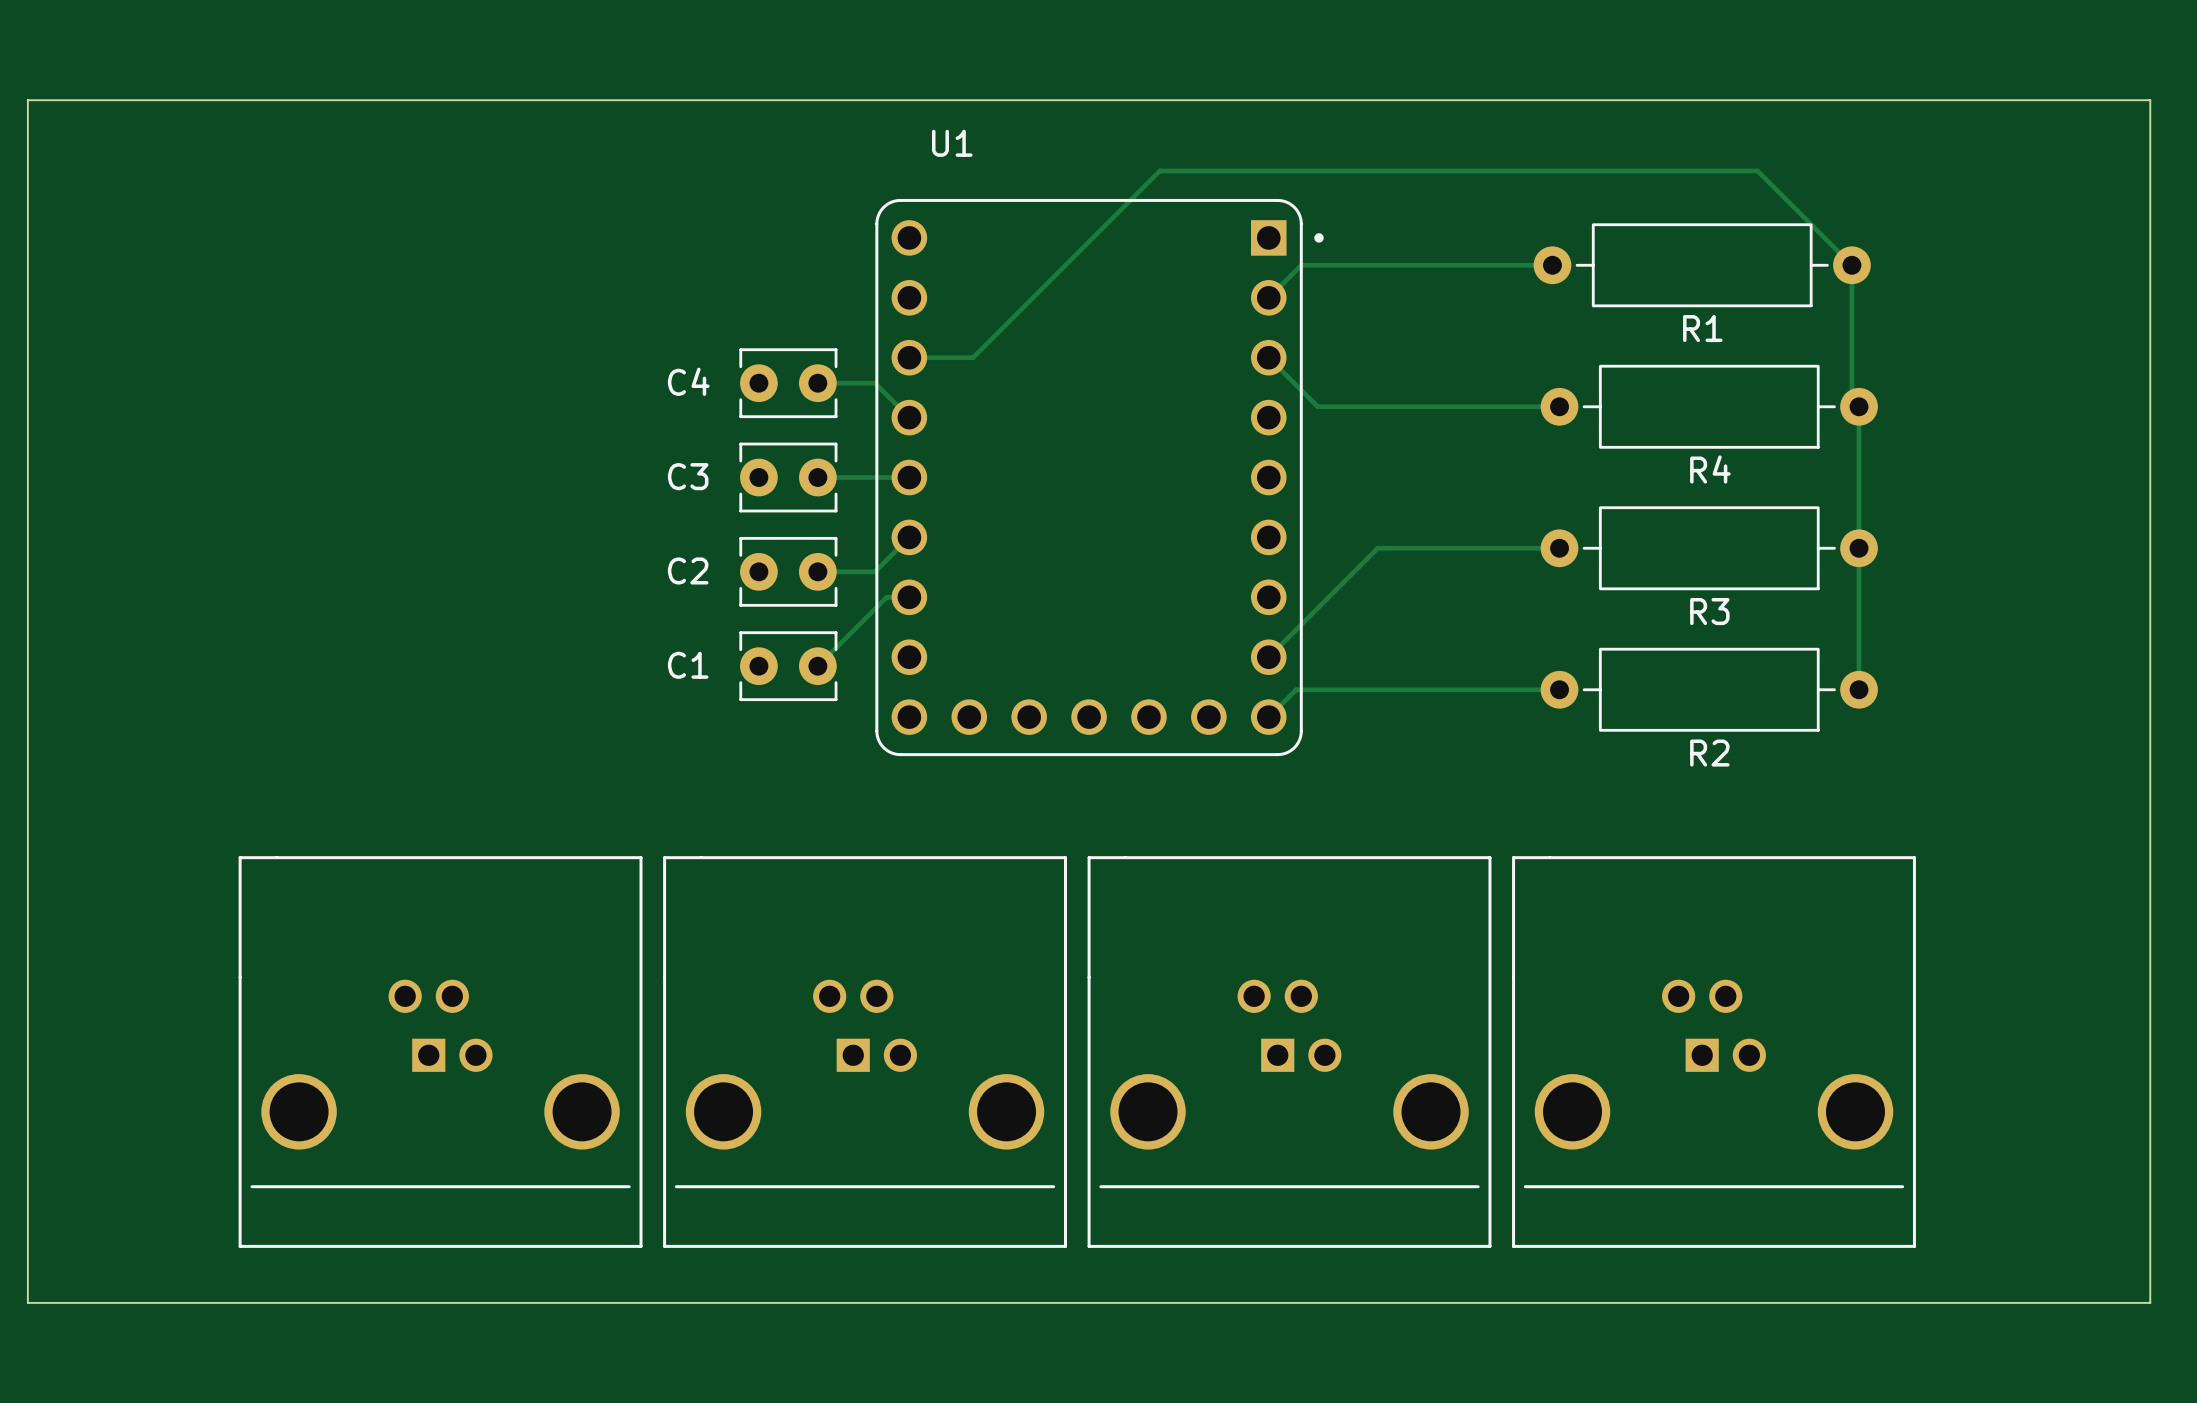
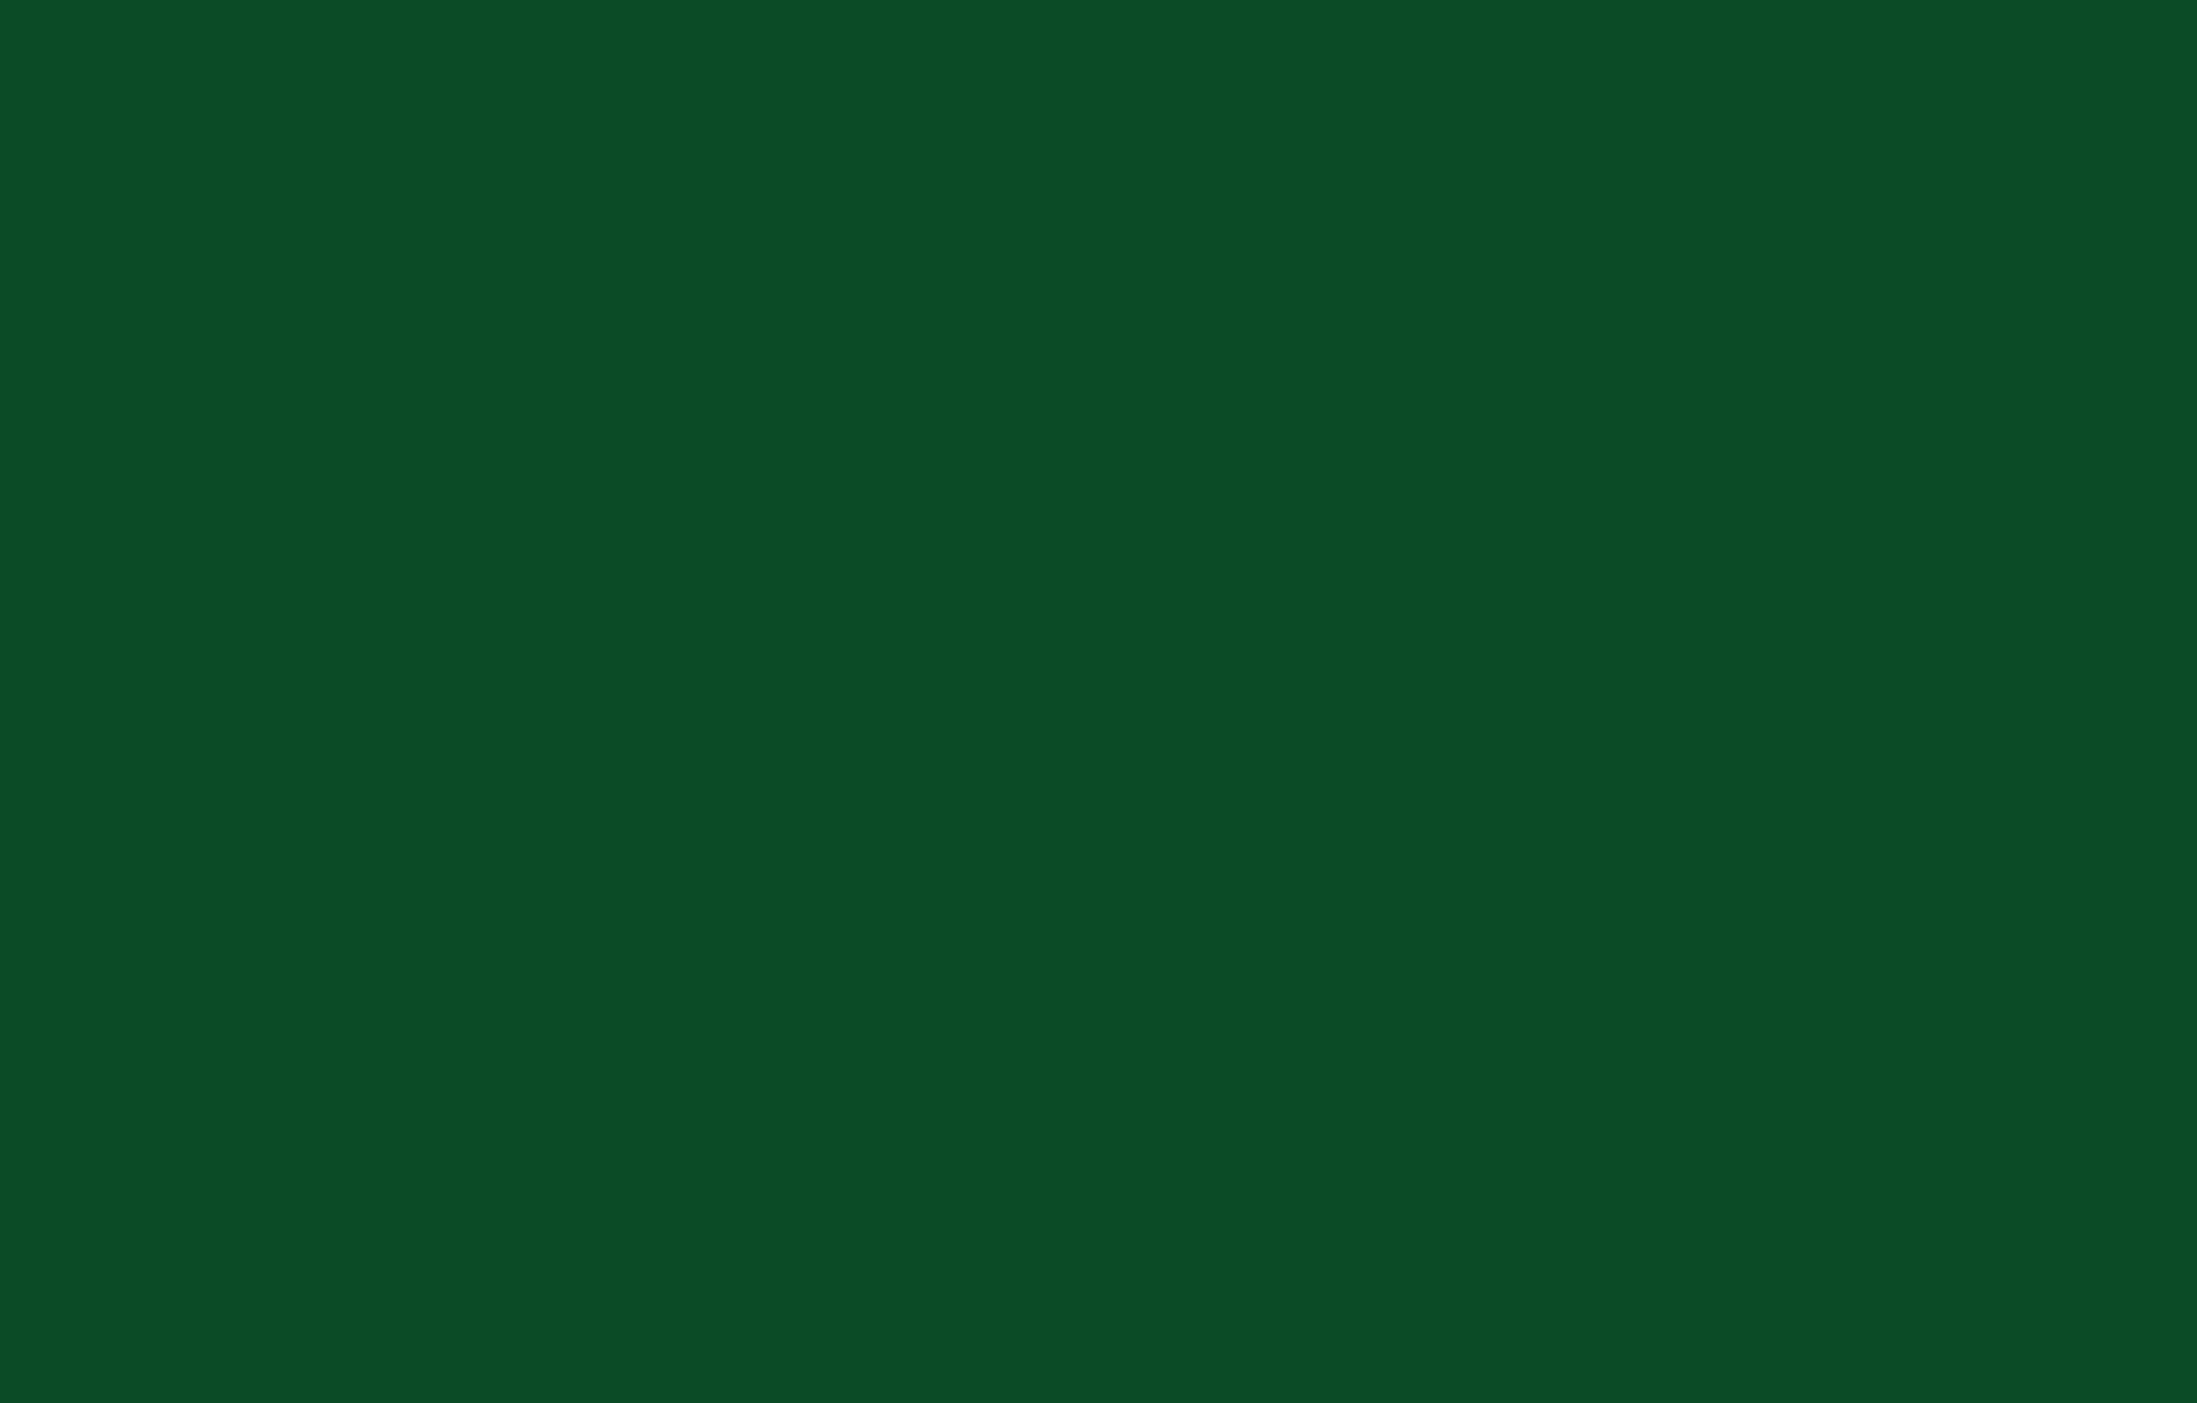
board edge: (27, 100) (2150, 100) (2150, 1302) (27, 1302) (27, 100) -> none
track: (1552, 265) (1301, 265) (1268, 297) -> none
R1: (1702, 265) -> none
track: (909, 357) (973, 357) (1159, 170) (1757, 170) (1851, 265) (1851, 399) (1859, 406) (1859, 689) -> none
track: (1268, 357) (1317, 406) (1559, 406) -> none
C4: (788, 383) -> none
track: (817, 383) (874, 383) (909, 417) -> none
R4: (1709, 406) -> none
C3: (788, 477) -> none
track: (817, 477) (909, 477) -> none
U1: (1099, 477) -> none
track: (909, 537) (874, 571) (817, 571) -> none
track: (1559, 548) (1377, 548) (1268, 657) -> none
R3: (1709, 548) -> none
C2: (788, 571) -> none
track: (909, 597) (886, 597) (817, 666) -> none
C1: (788, 666) -> none
track: (1559, 689) (1296, 689) (1268, 717) -> none
R2: (1709, 689) -> none
part: (440, 1052) -> none
part: (865, 1052) -> none
part: (1289, 1052) -> none
part: (1714, 1052) -> none

